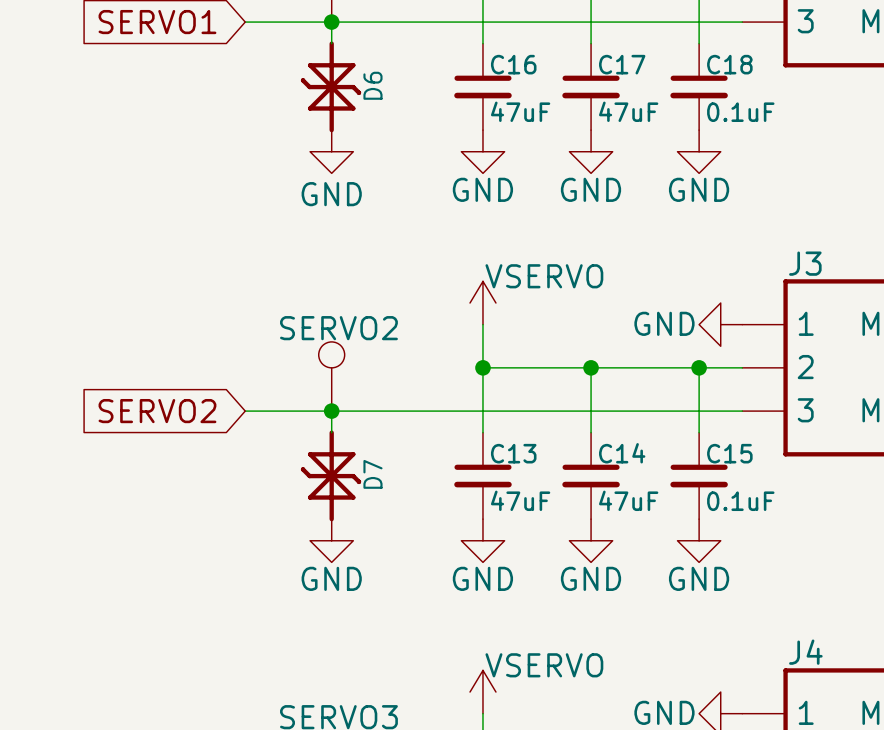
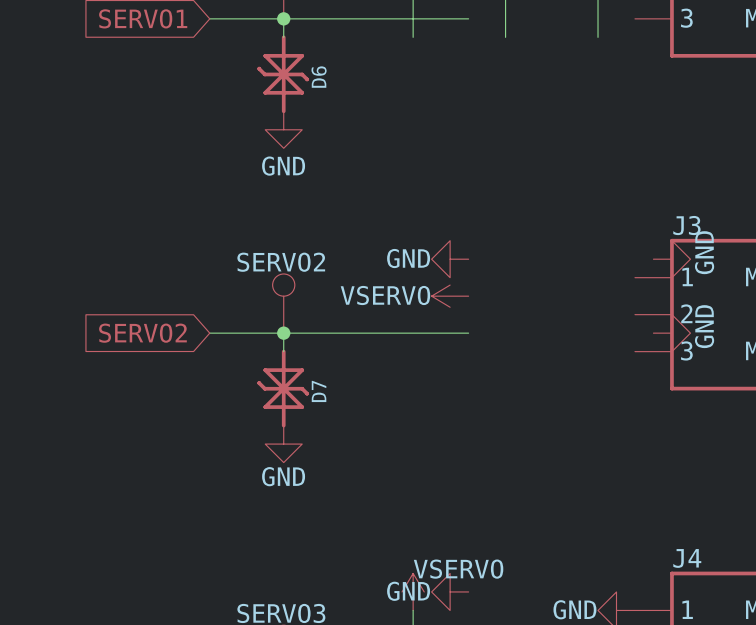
wire: (547, 22) (742, 22) -> none
C16: 47uF (482, 86) -> none
C17: 47uF (591, 86) -> none
C18: 0.1uF (699, 86) -> none
power symbol: GND (482, 151) -> none
power symbol: GND (591, 151) -> none
power symbol: GND (699, 151) -> none
power symbol text position: VSERVO (544, 276) -> VSERVO (385, 295)
power symbol rotation: 0° (482, 303) -> 90° counterclockwise (450, 296)
power symbol position: VSERVO (482, 303) -> VSERVO (450, 296)
power symbol: none -> GND (450, 259)
power symbol: none -> GND (671, 259)
wire: (482, 324) (482, 432) -> none
power symbol: GND (720, 324) -> none
wire: (482, 367) (742, 367) -> none
junction: (482, 367) -> none
wire: (591, 367) (591, 432) -> none
junction: (591, 367) -> none
wire: (699, 367) (699, 432) -> none
junction: (699, 367) -> none
part position: (331, 376) -> (283, 303)
wire: none -> (209, 333) (468, 333)
power symbol: none -> GND (671, 333)
global label position: SERVO2 (157, 411) -> SERVO2 (142, 333)
wire: (245, 411) (742, 411) -> none
junction position: (331, 411) -> (283, 333)
D7 position: (331, 475) -> (283, 388)
C13: 47uF (482, 475) -> none
C14: 47uF (591, 475) -> none
C15: 0.1uF (699, 475) -> none
power symbol position: GND (331, 540) -> GND (283, 444)
power symbol: GND (482, 540) -> none
power symbol: GND (591, 540) -> none
power symbol: GND (699, 540) -> none
power symbol: none -> GND (450, 591)

